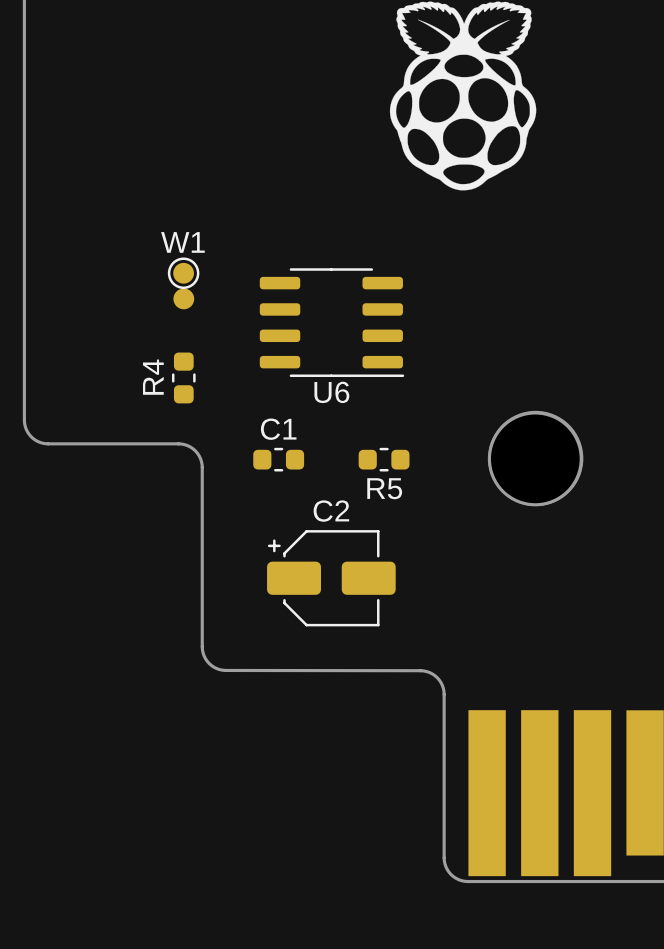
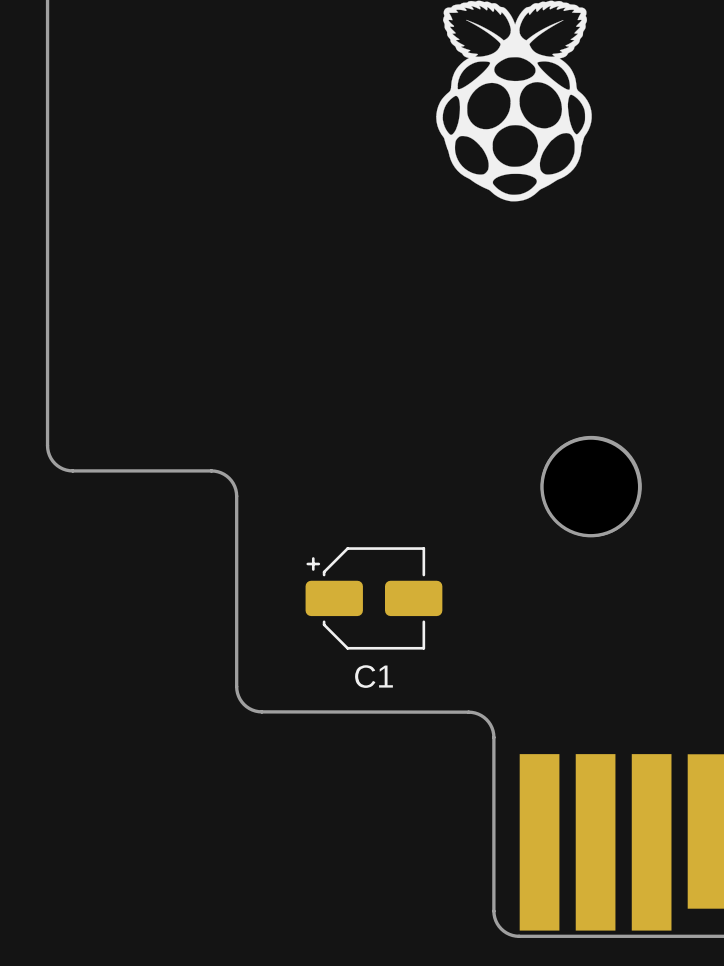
W1: (183, 283) -> none
U6: (332, 322) -> none
R4: (183, 377) -> none
C1 name position: C1 (278, 429) -> C1 (373, 676)
C1 footprint: [253, 447, 305, 472] -> [305, 547, 443, 650]
R5: (384, 459) -> none
C2: (331, 578) -> none

